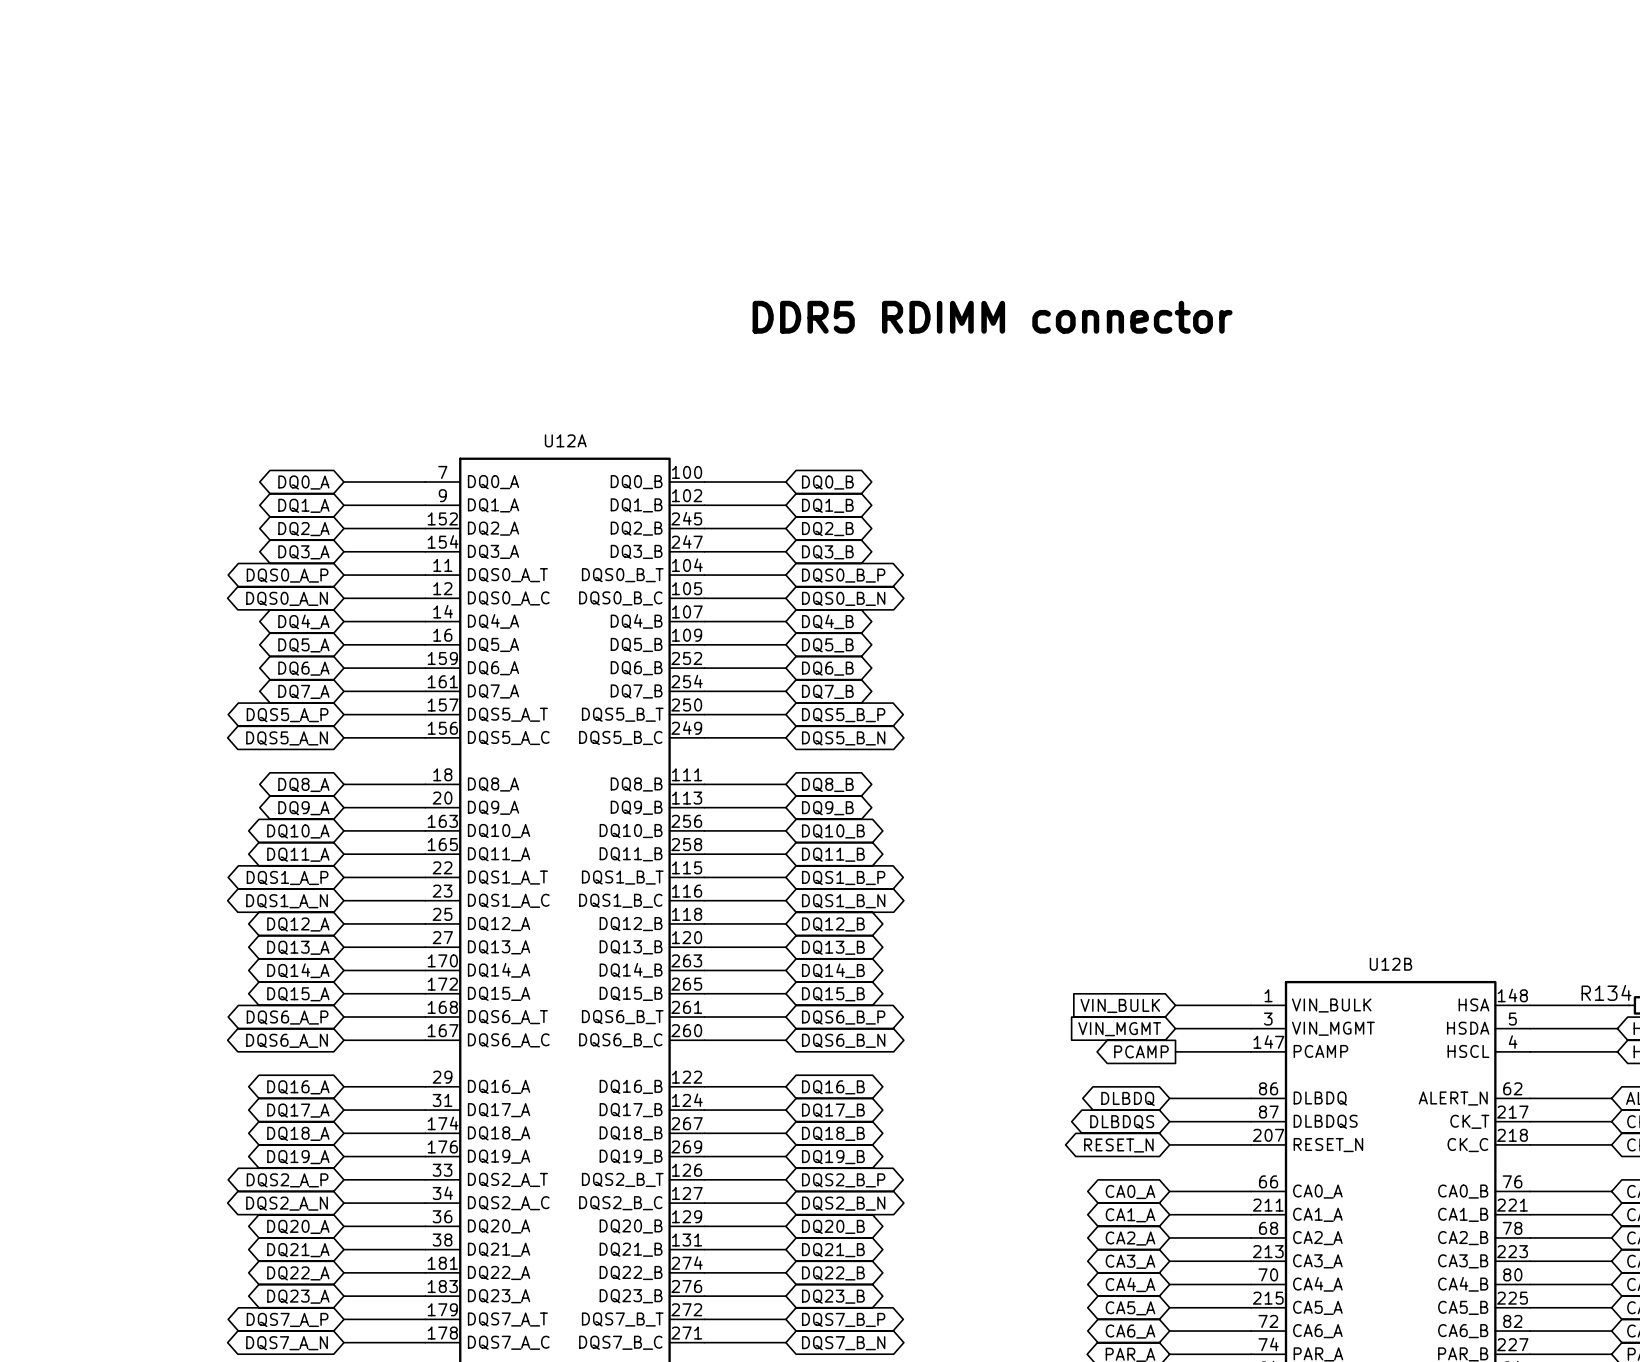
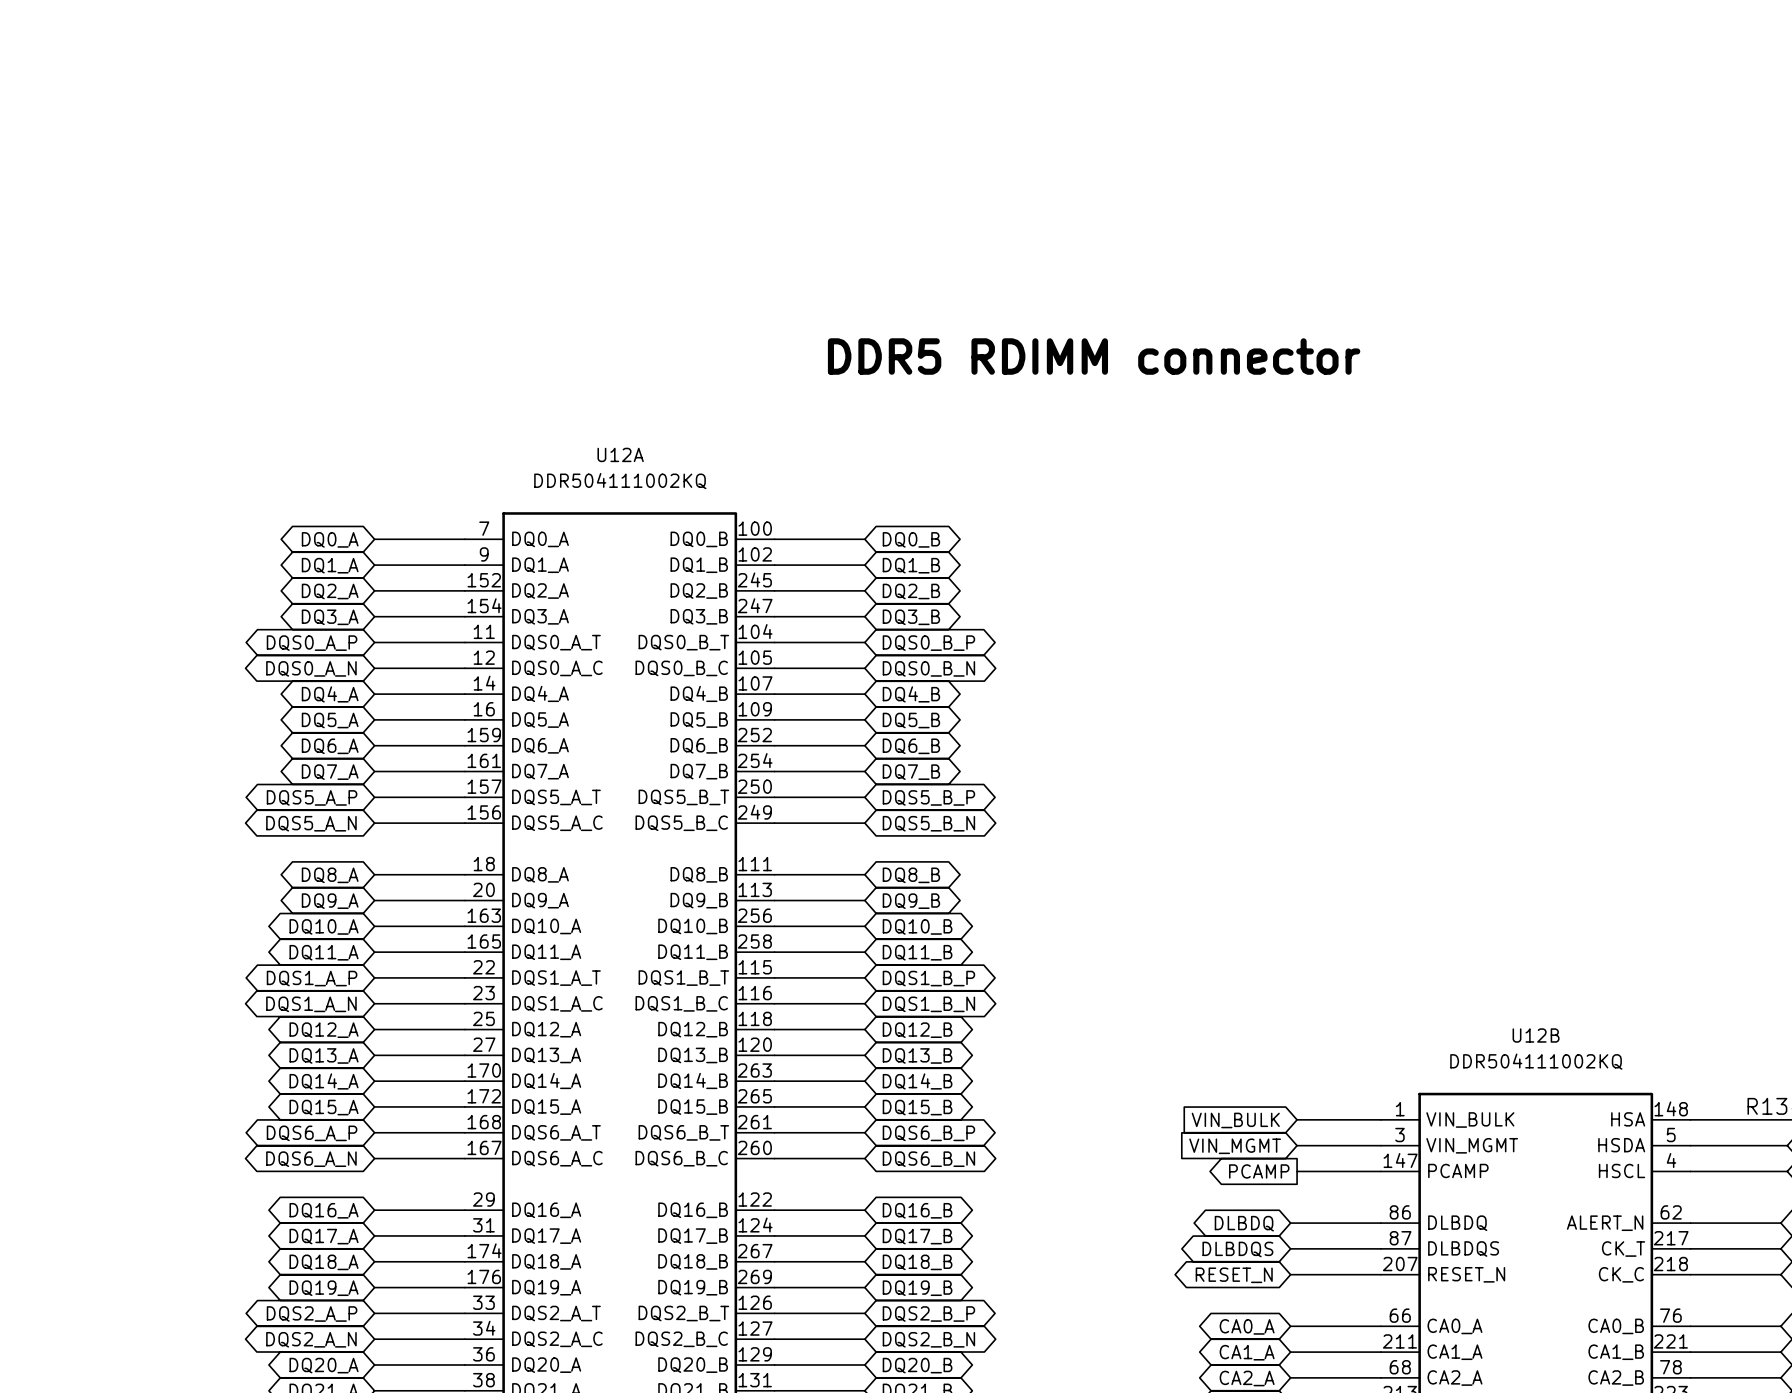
U12A text: none -> DDR504111002KQ (620, 481)
U12A name position: U12A (565, 440) -> U12A (620, 454)
U12B text: none -> DDR504111002KQ (1536, 1061)
U12B name position: U12B (1390, 964) -> U12B (1536, 1035)

